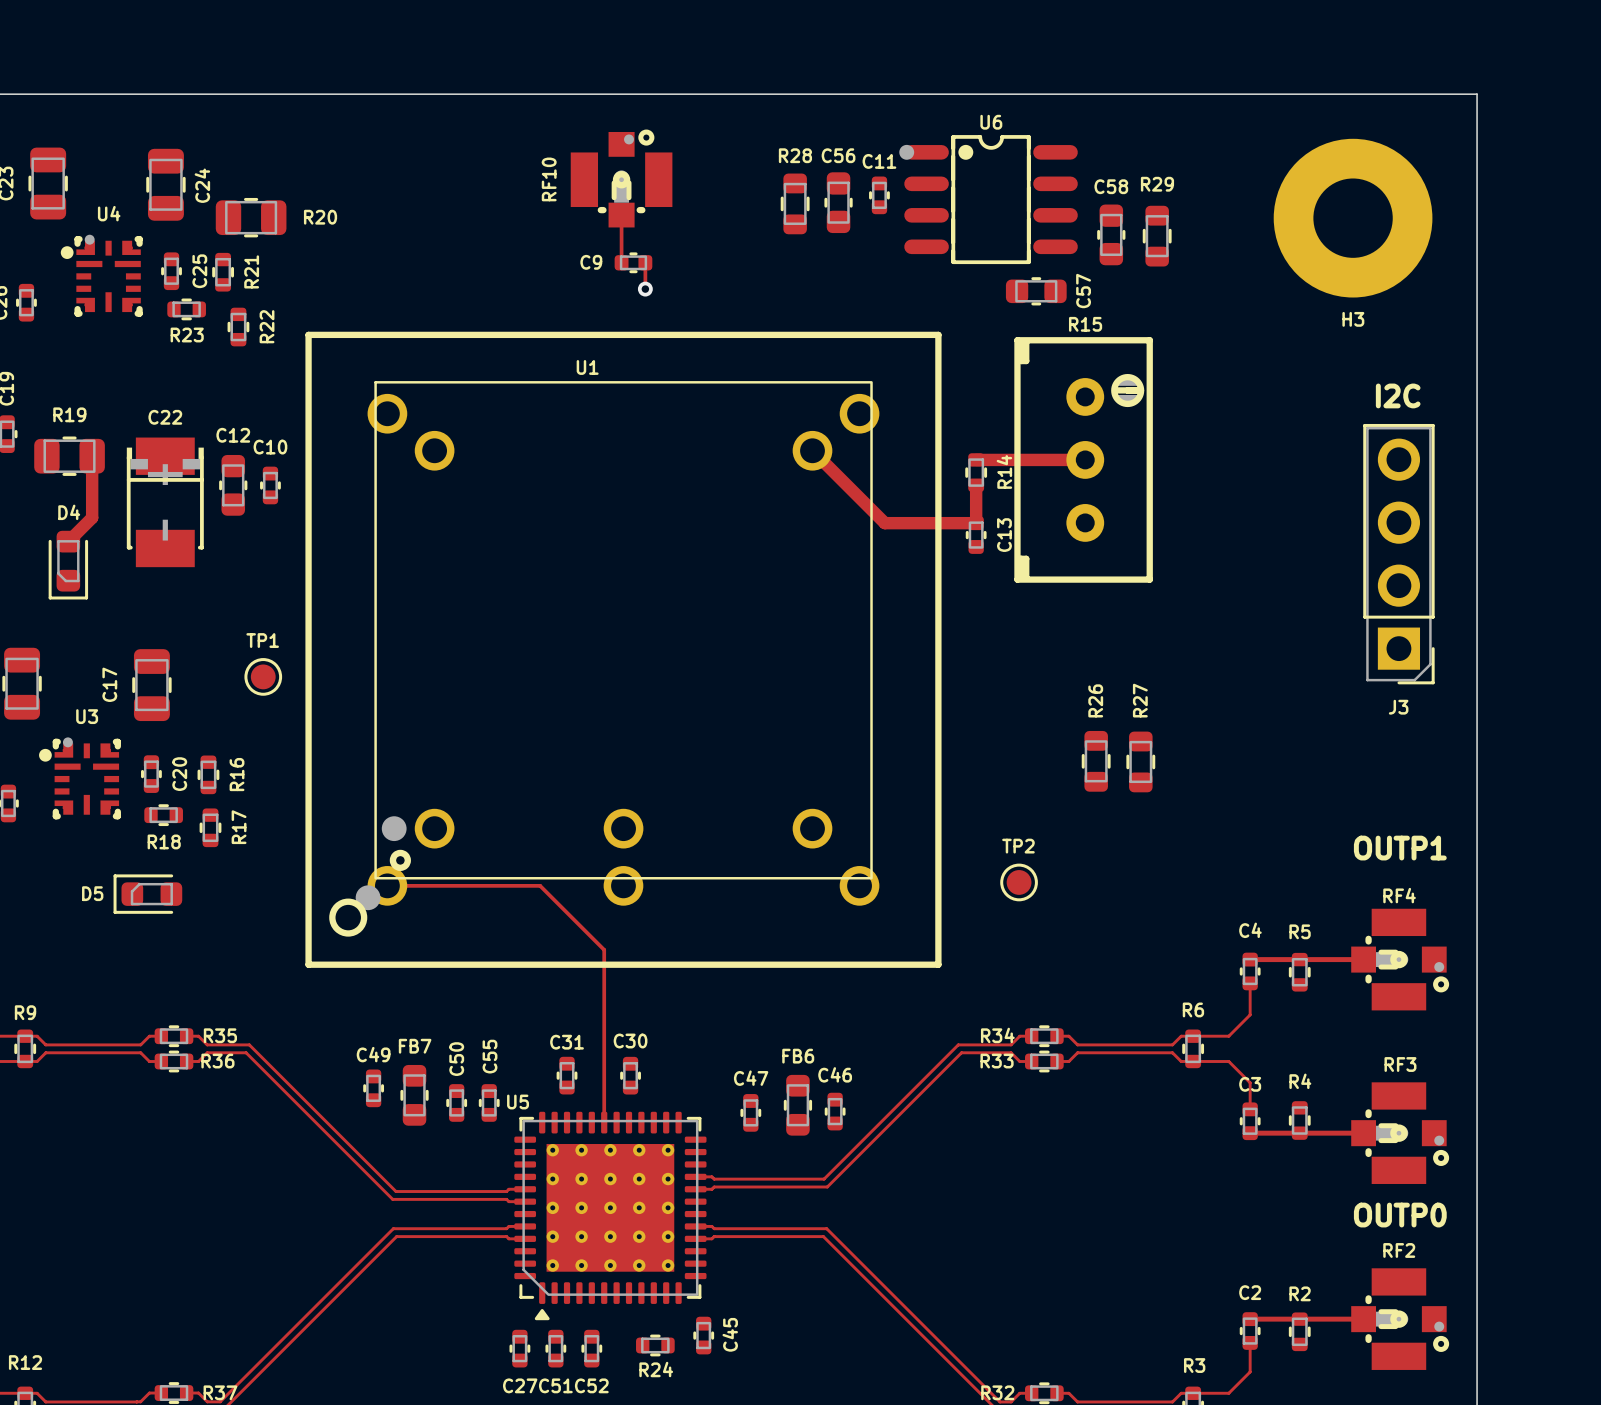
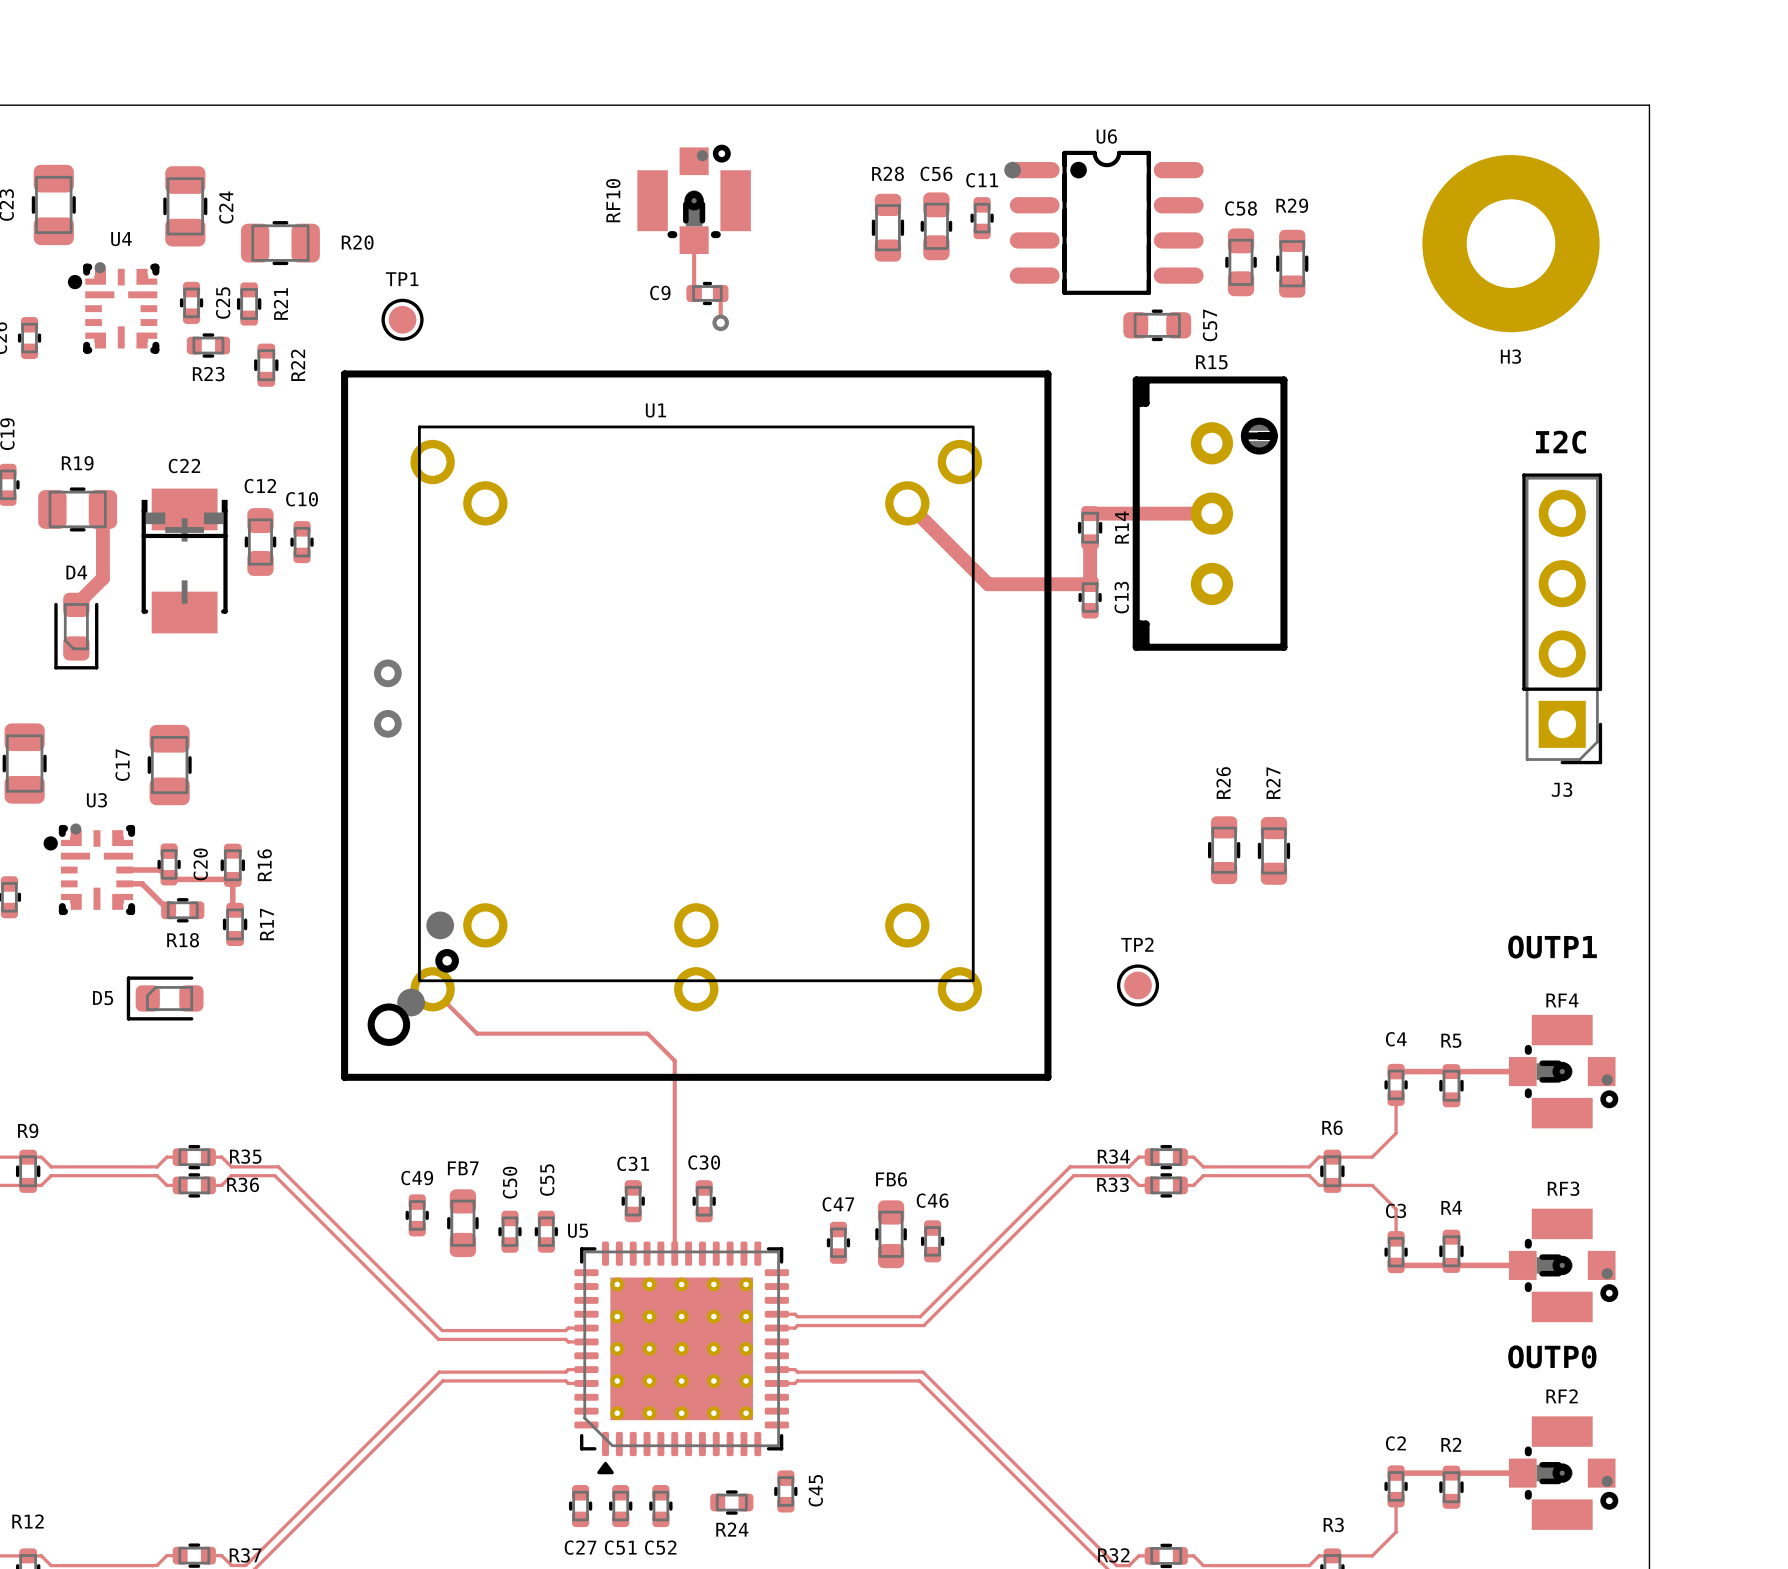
via: none -> (387, 673)
via: none -> (387, 723)
TP1 position: (263, 676) -> (402, 319)
track: none -> (124, 869) (159, 869) (169, 879) (232, 879) (232, 909)
track: none -> (124, 883) (142, 883) (168, 910)
track: (387, 885) (540, 885) (579, 925) -> (432, 989) (477, 1033) (647, 1033)

